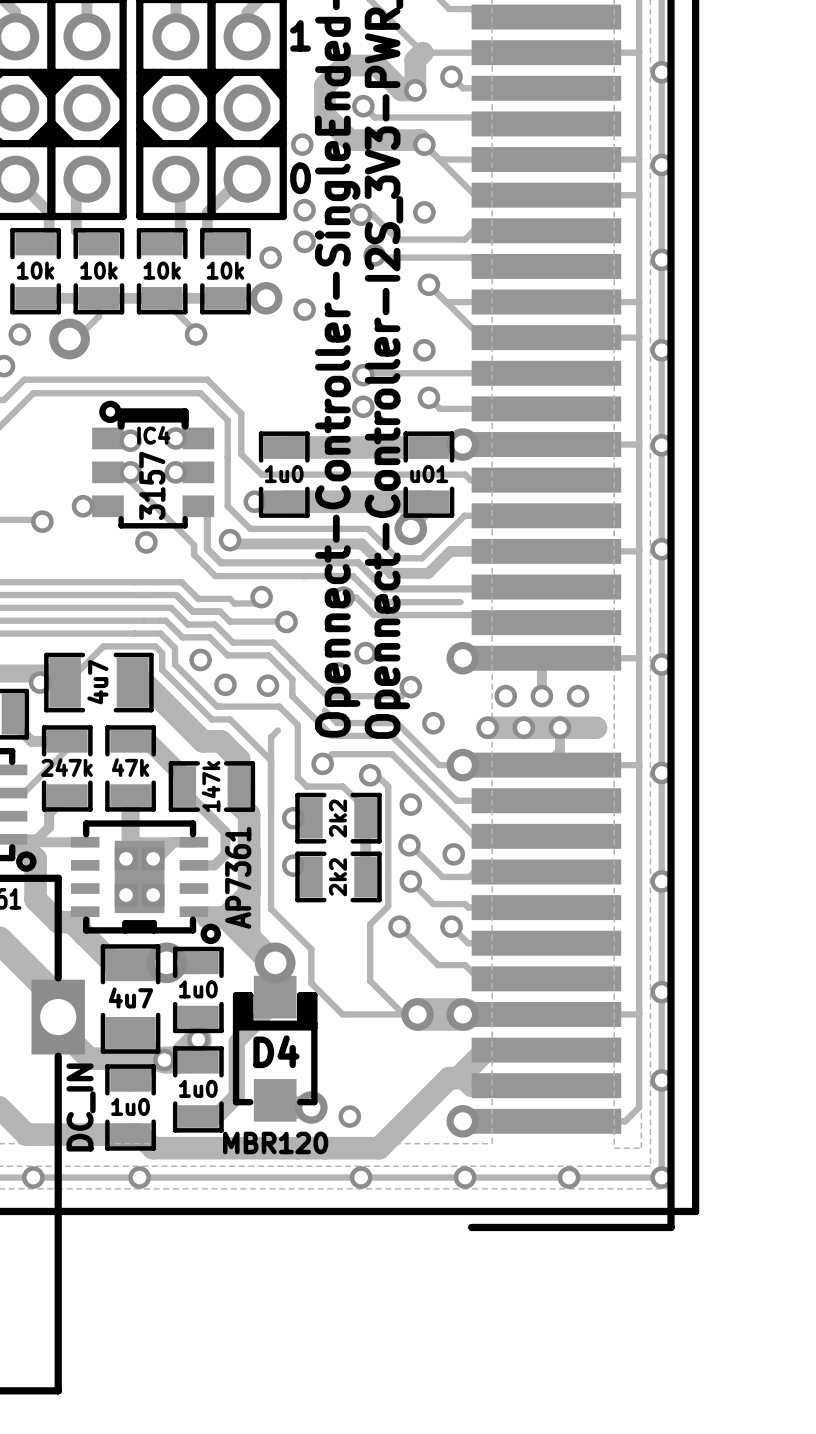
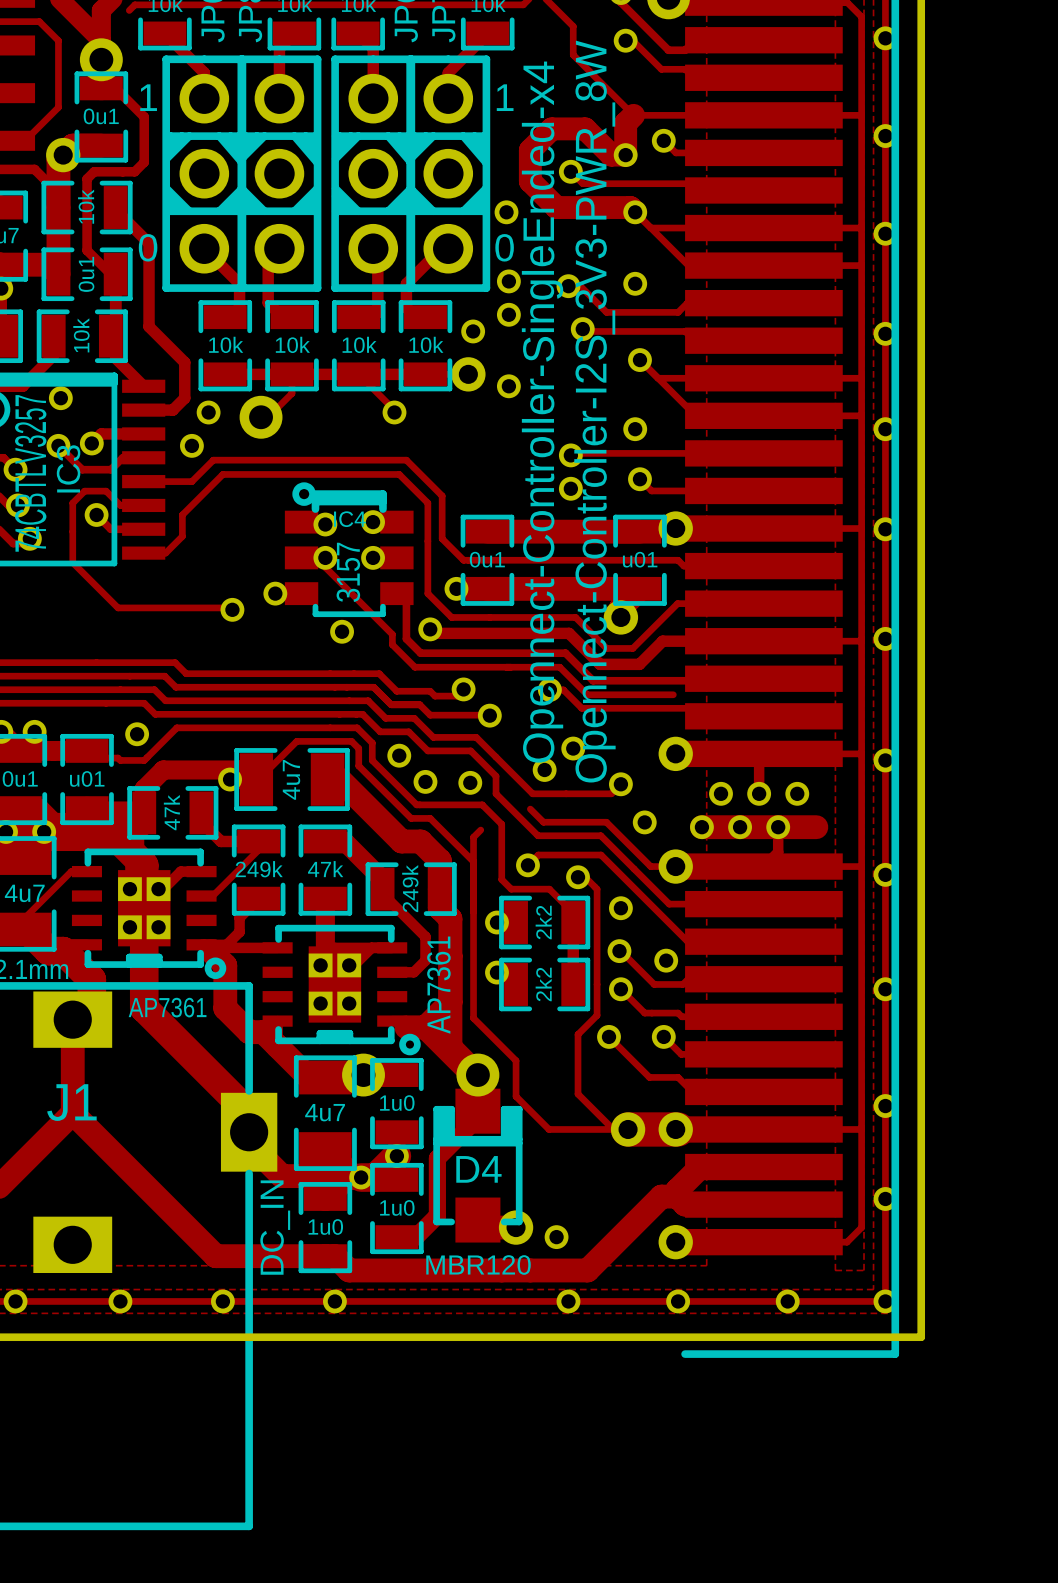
part value: 1u0 (284, 474) -> 0u1 (487, 559)
part value: 247k (66, 767) -> 249k (259, 869)
part value: 147k (211, 786) -> 249k (410, 888)

